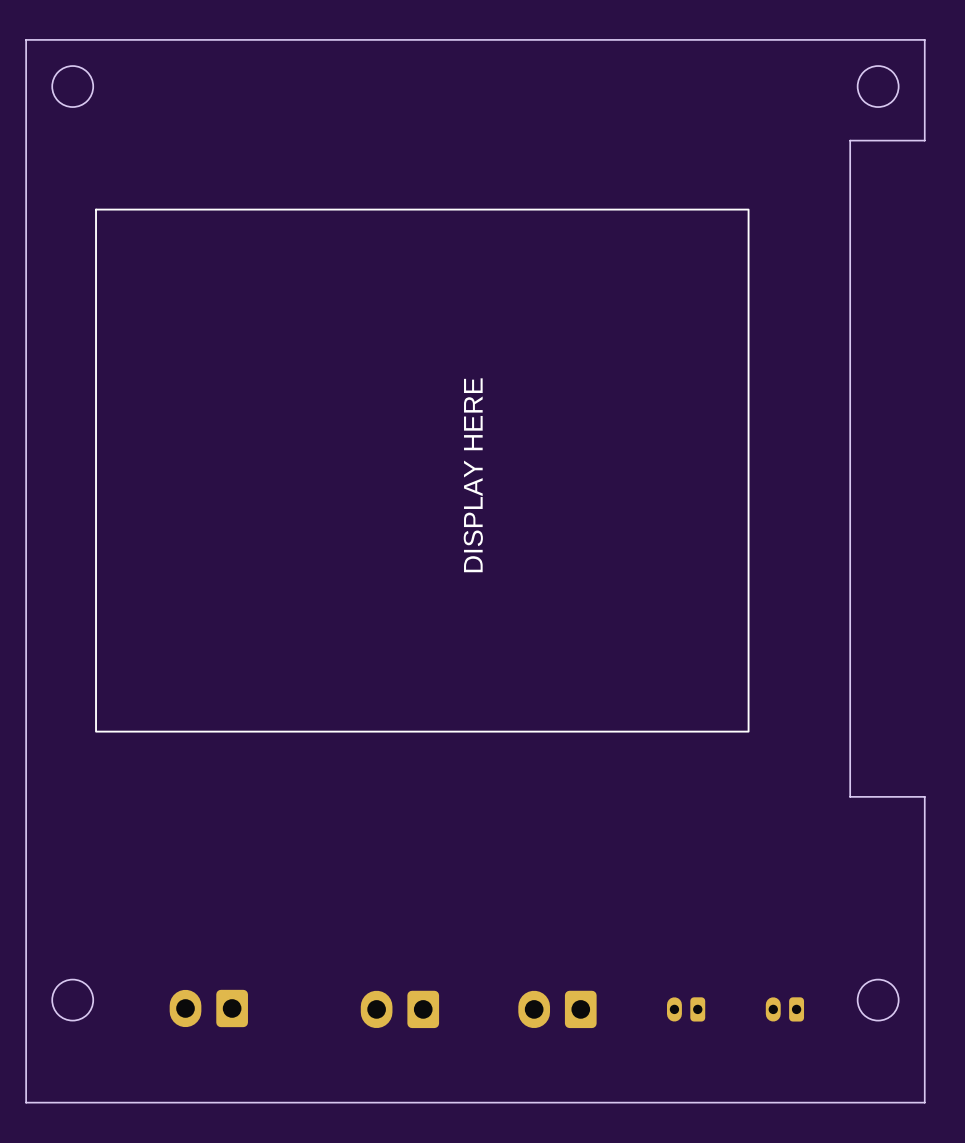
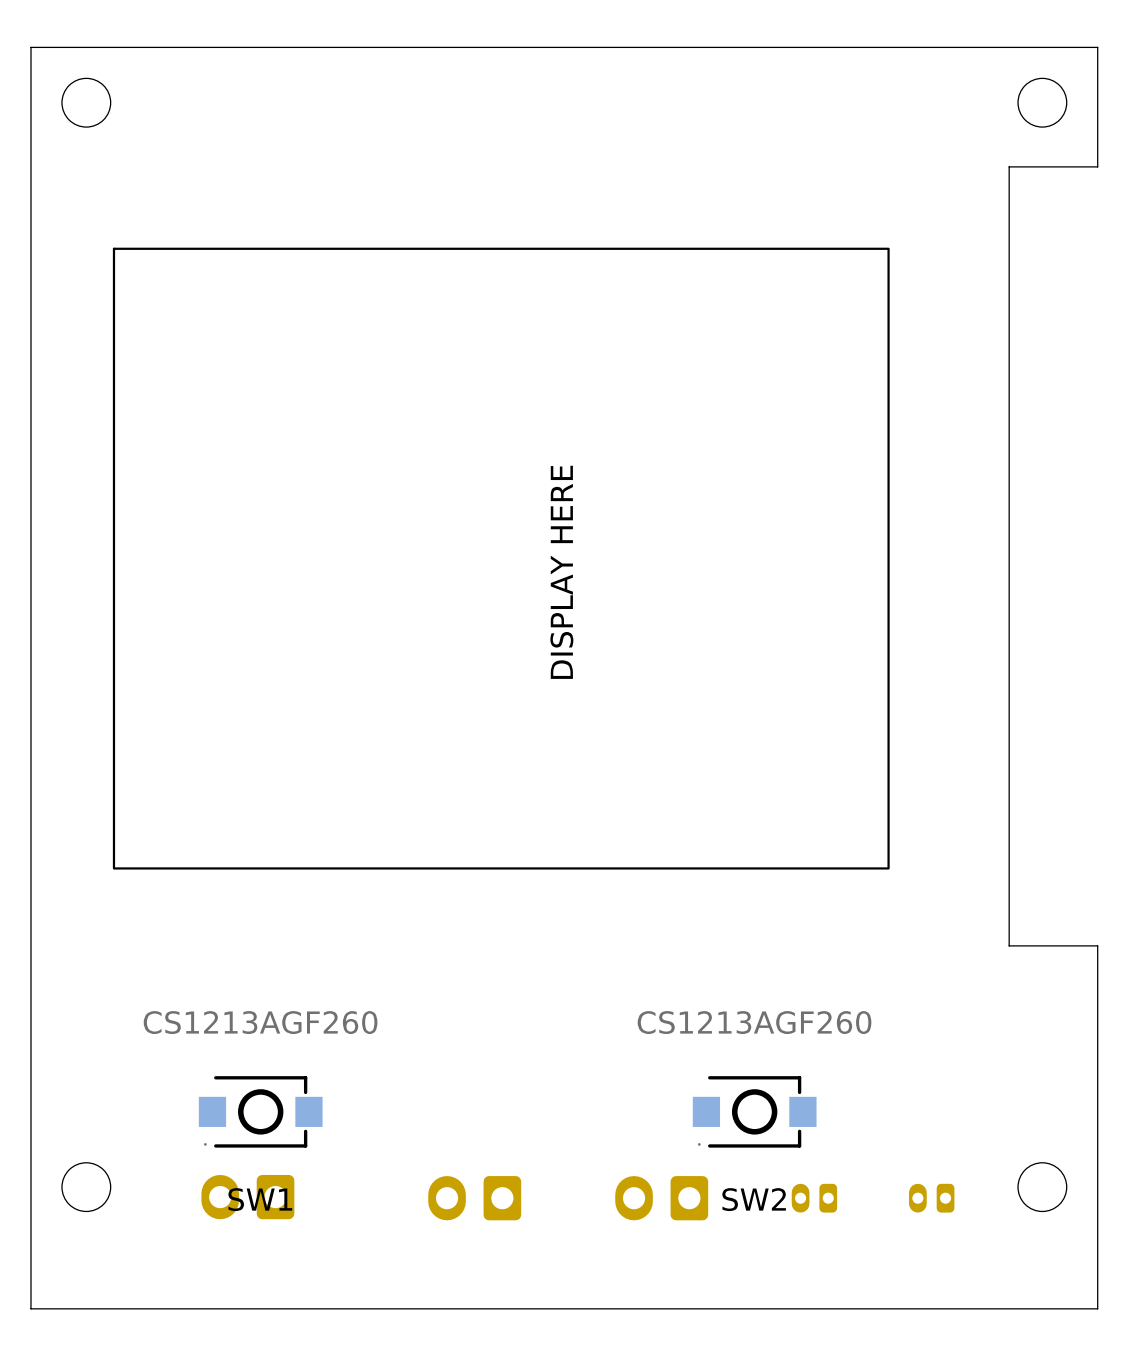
SW1: none -> CS1213AGF260 (260, 1111)
SW2: none -> CS1213AGF260 (754, 1111)

